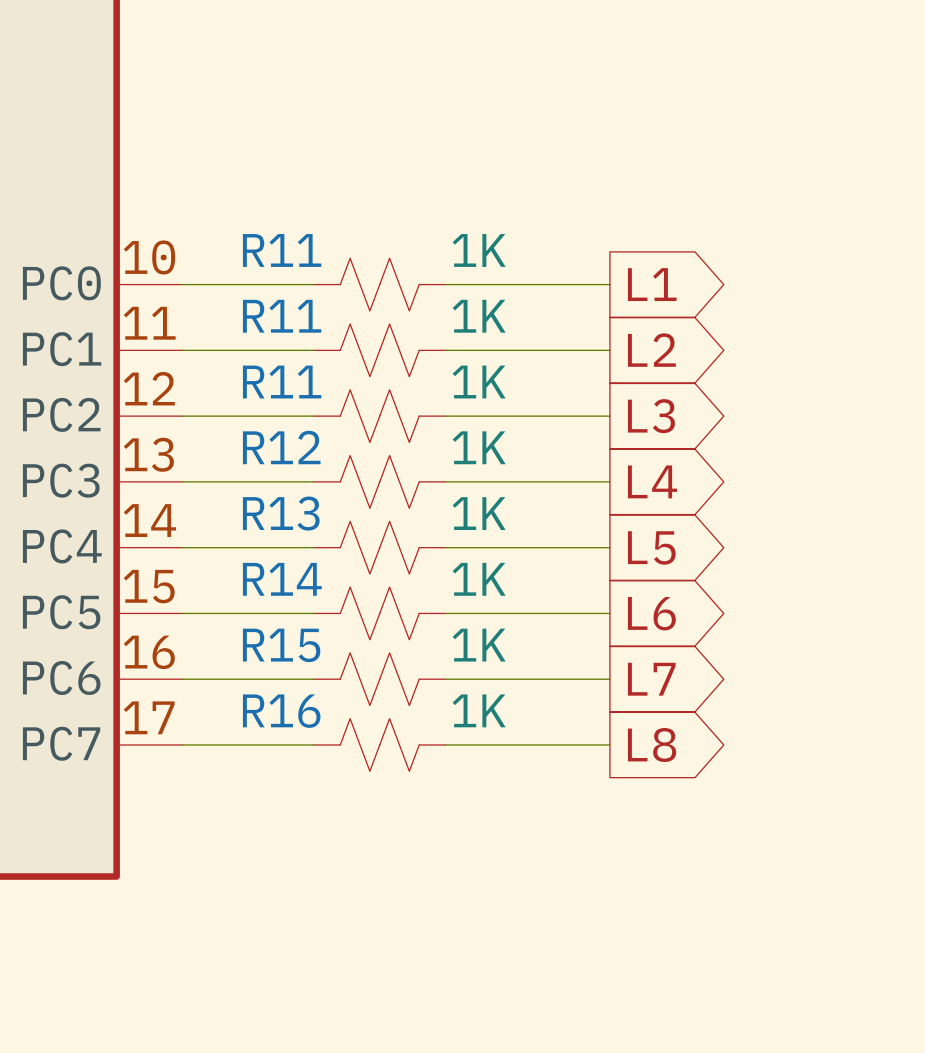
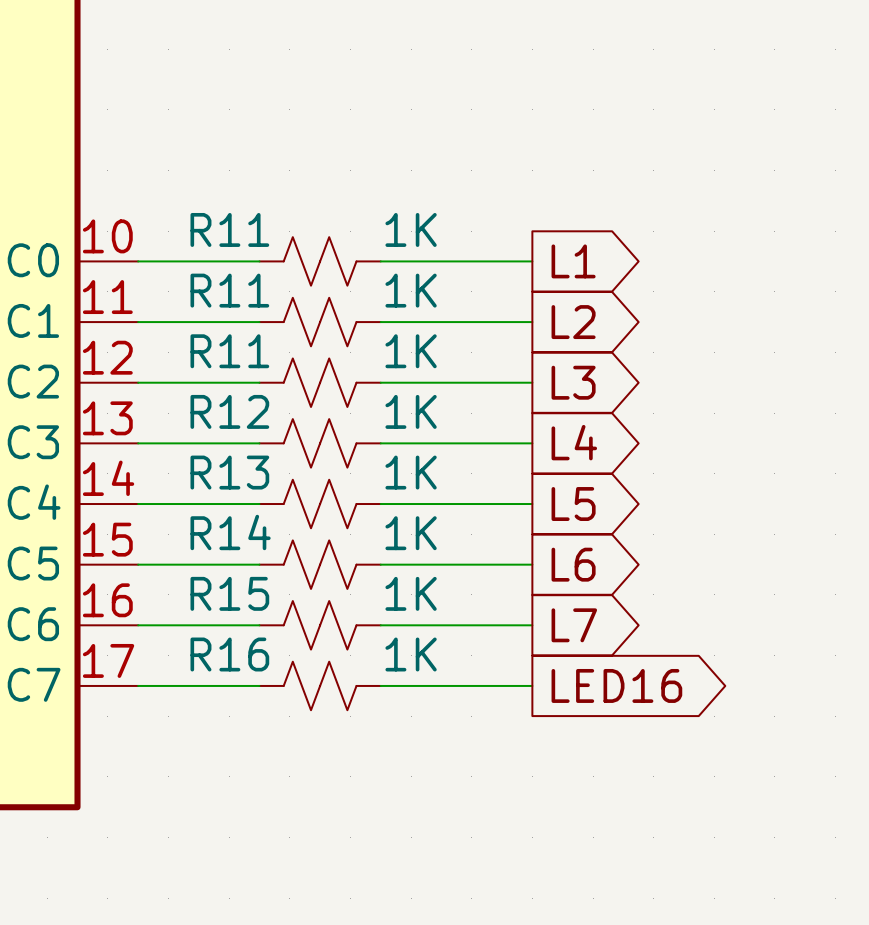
global label: L8 (652, 744) -> LED16 (616, 685)

